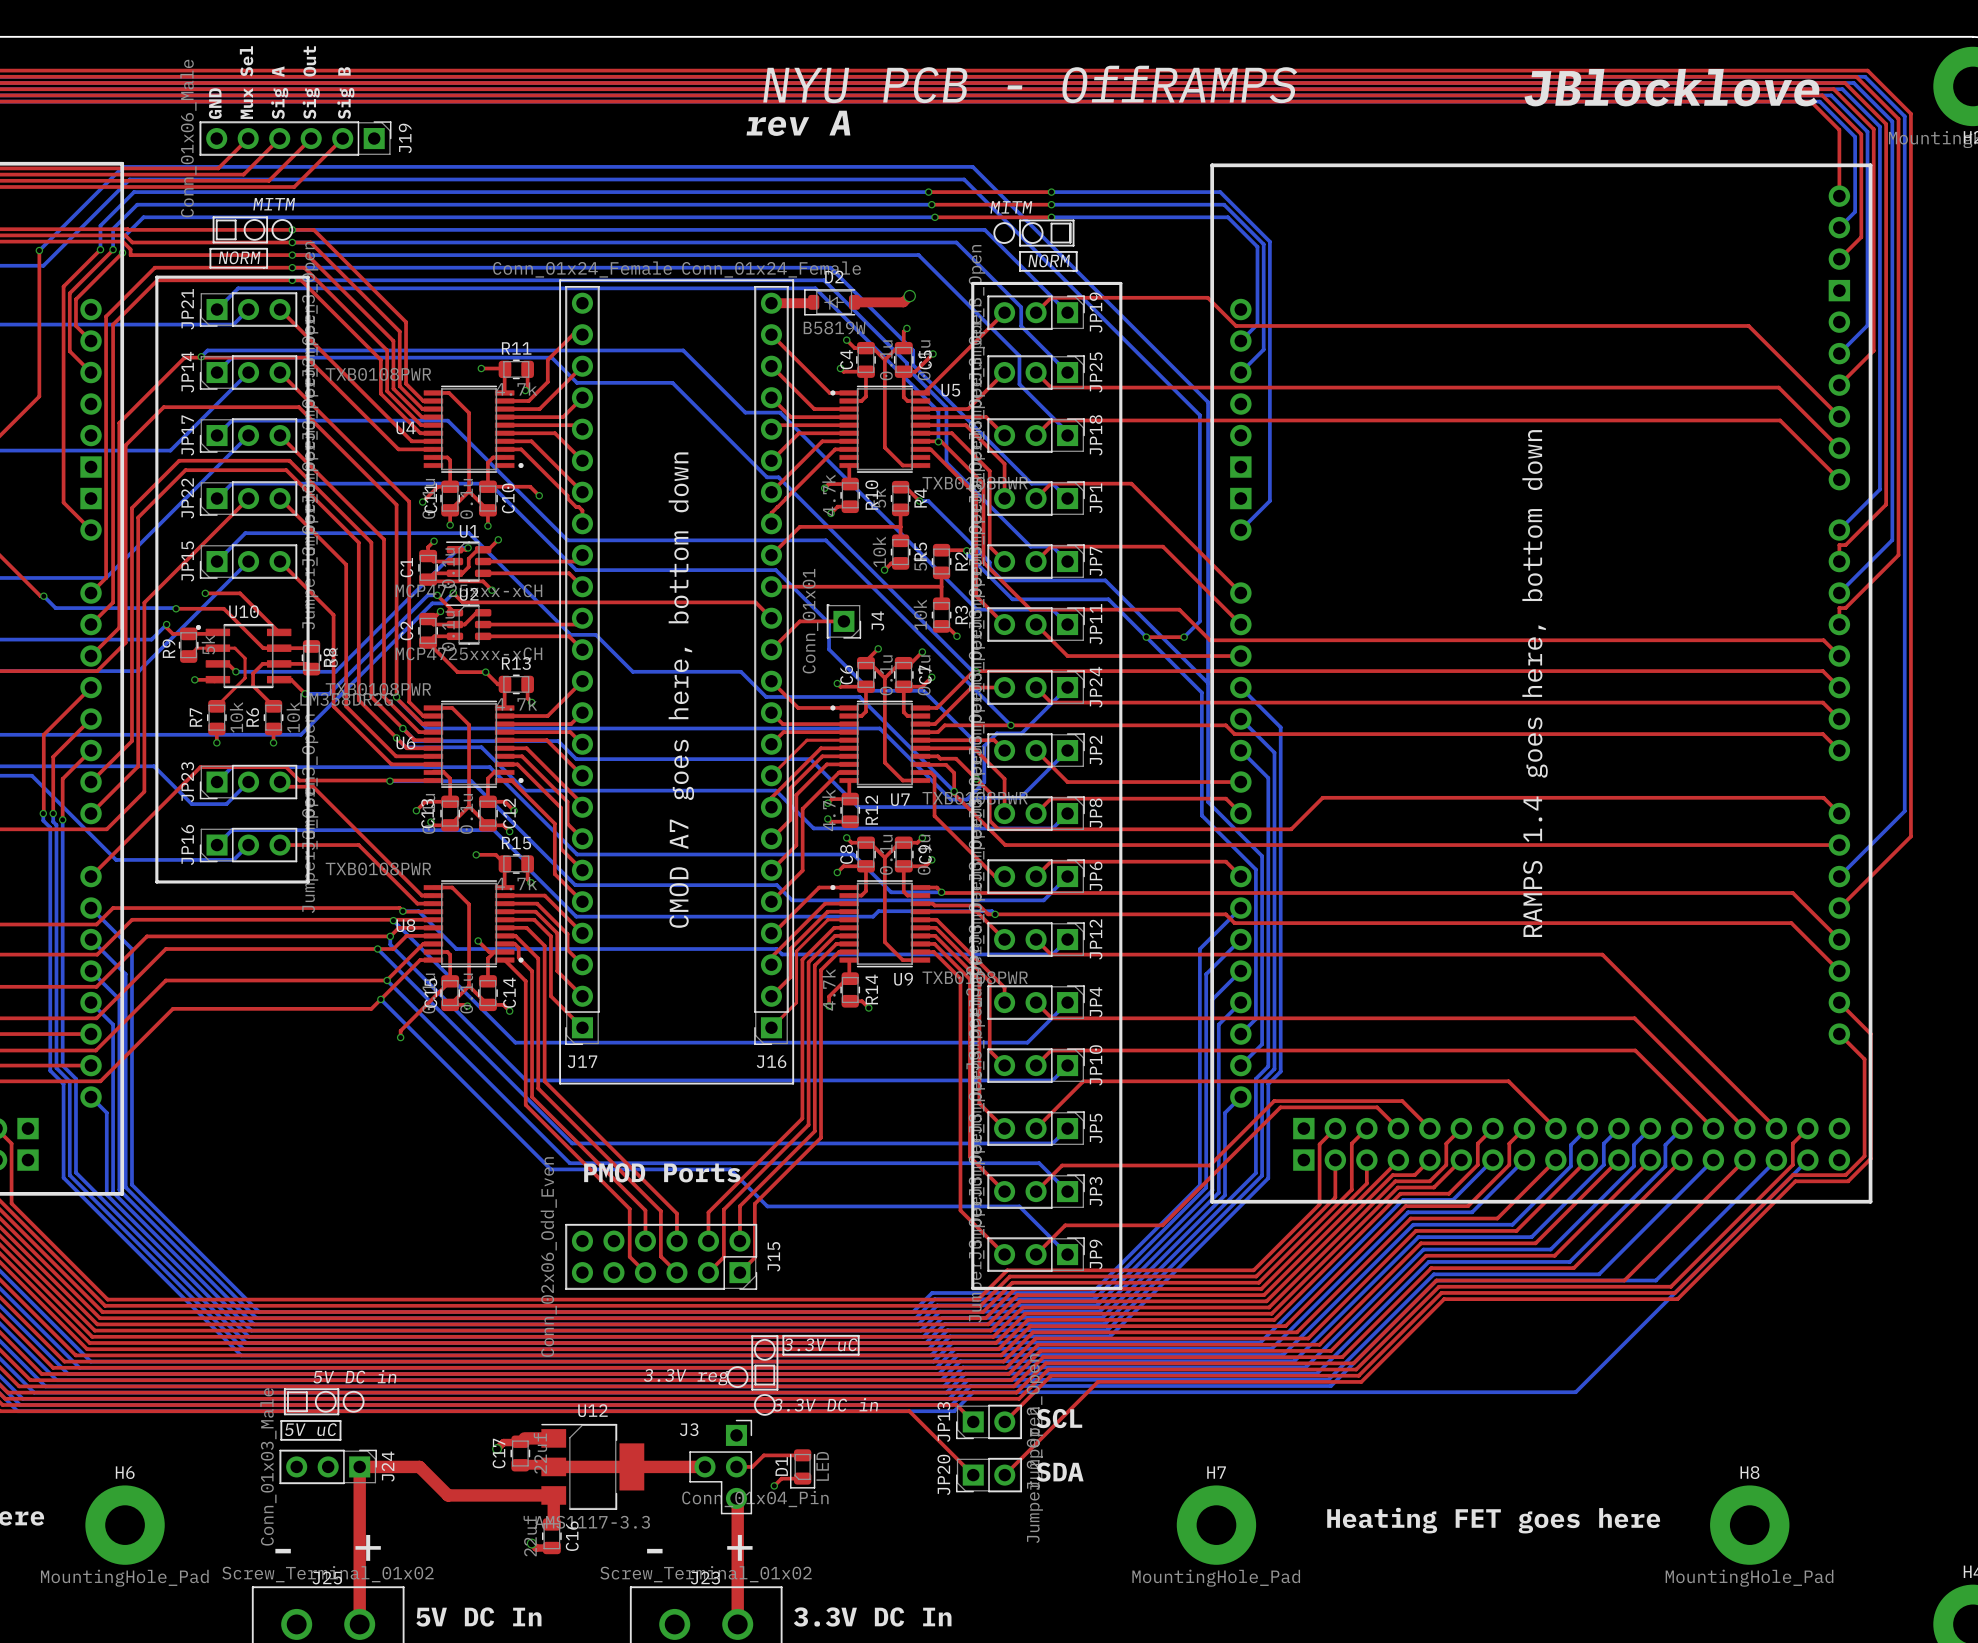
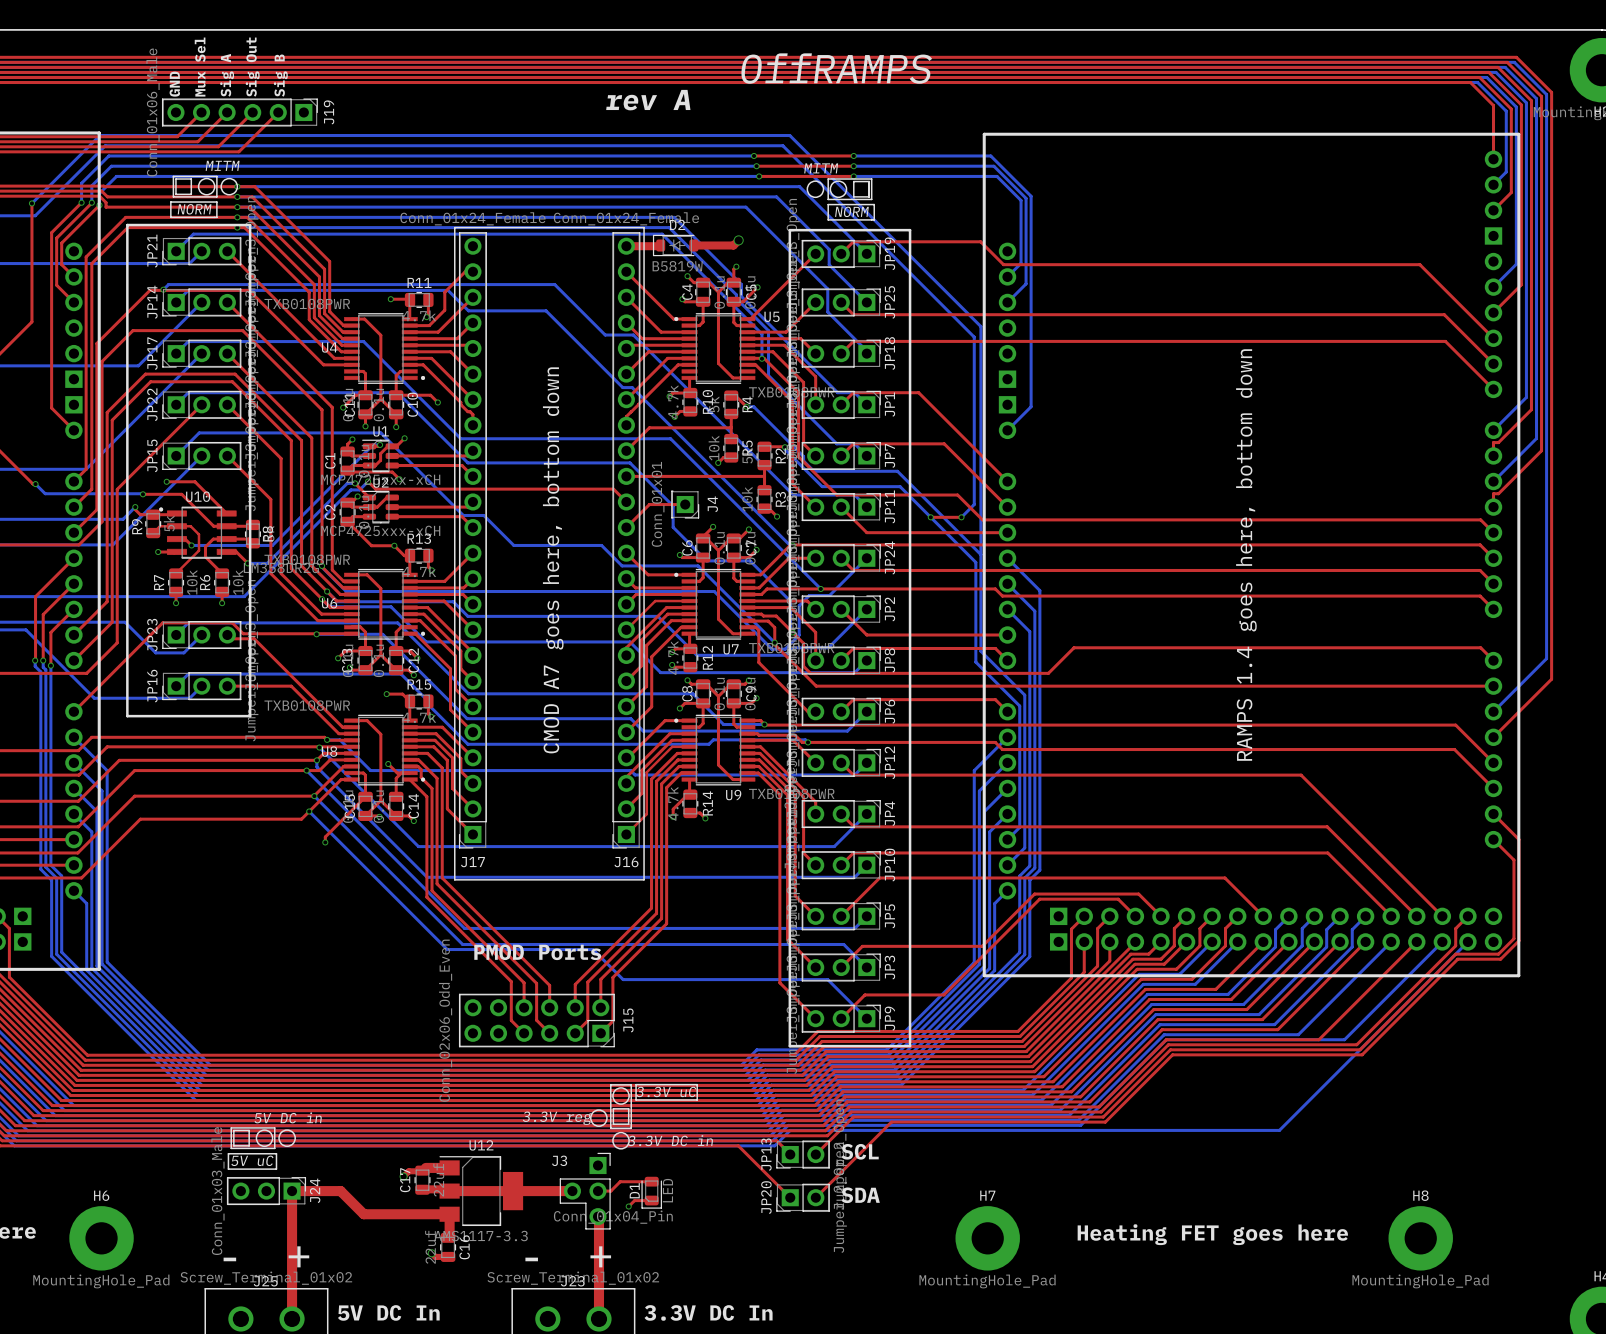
text: NYU PCB - OffRAMPS (1030, 84) -> OffRAMPS (836, 68)
text: JBlocklove (1672, 87) -> none

